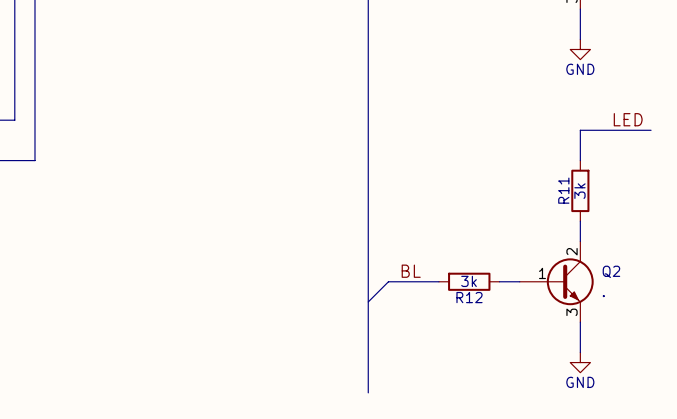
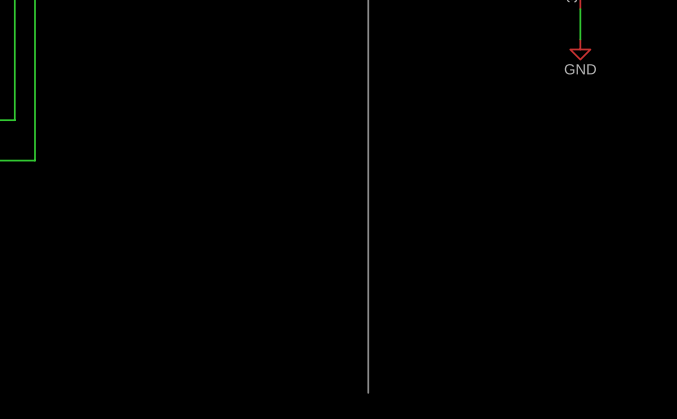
label: LED (628, 119) -> none
wire: (651, 130) (580, 130) (580, 160) -> none
R11: 3k (580, 190) -> none
wire: (580, 221) (580, 241) -> none
label: BL (411, 271) -> none
wire: (438, 281) (388, 281) (368, 301) -> none
R12: 3k (469, 281) -> none
wire: (499, 281) (519, 281) -> none
Q2: . (556, 281) -> none
wire: (580, 322) (580, 352) -> none
power symbol: GND (580, 362) -> none

